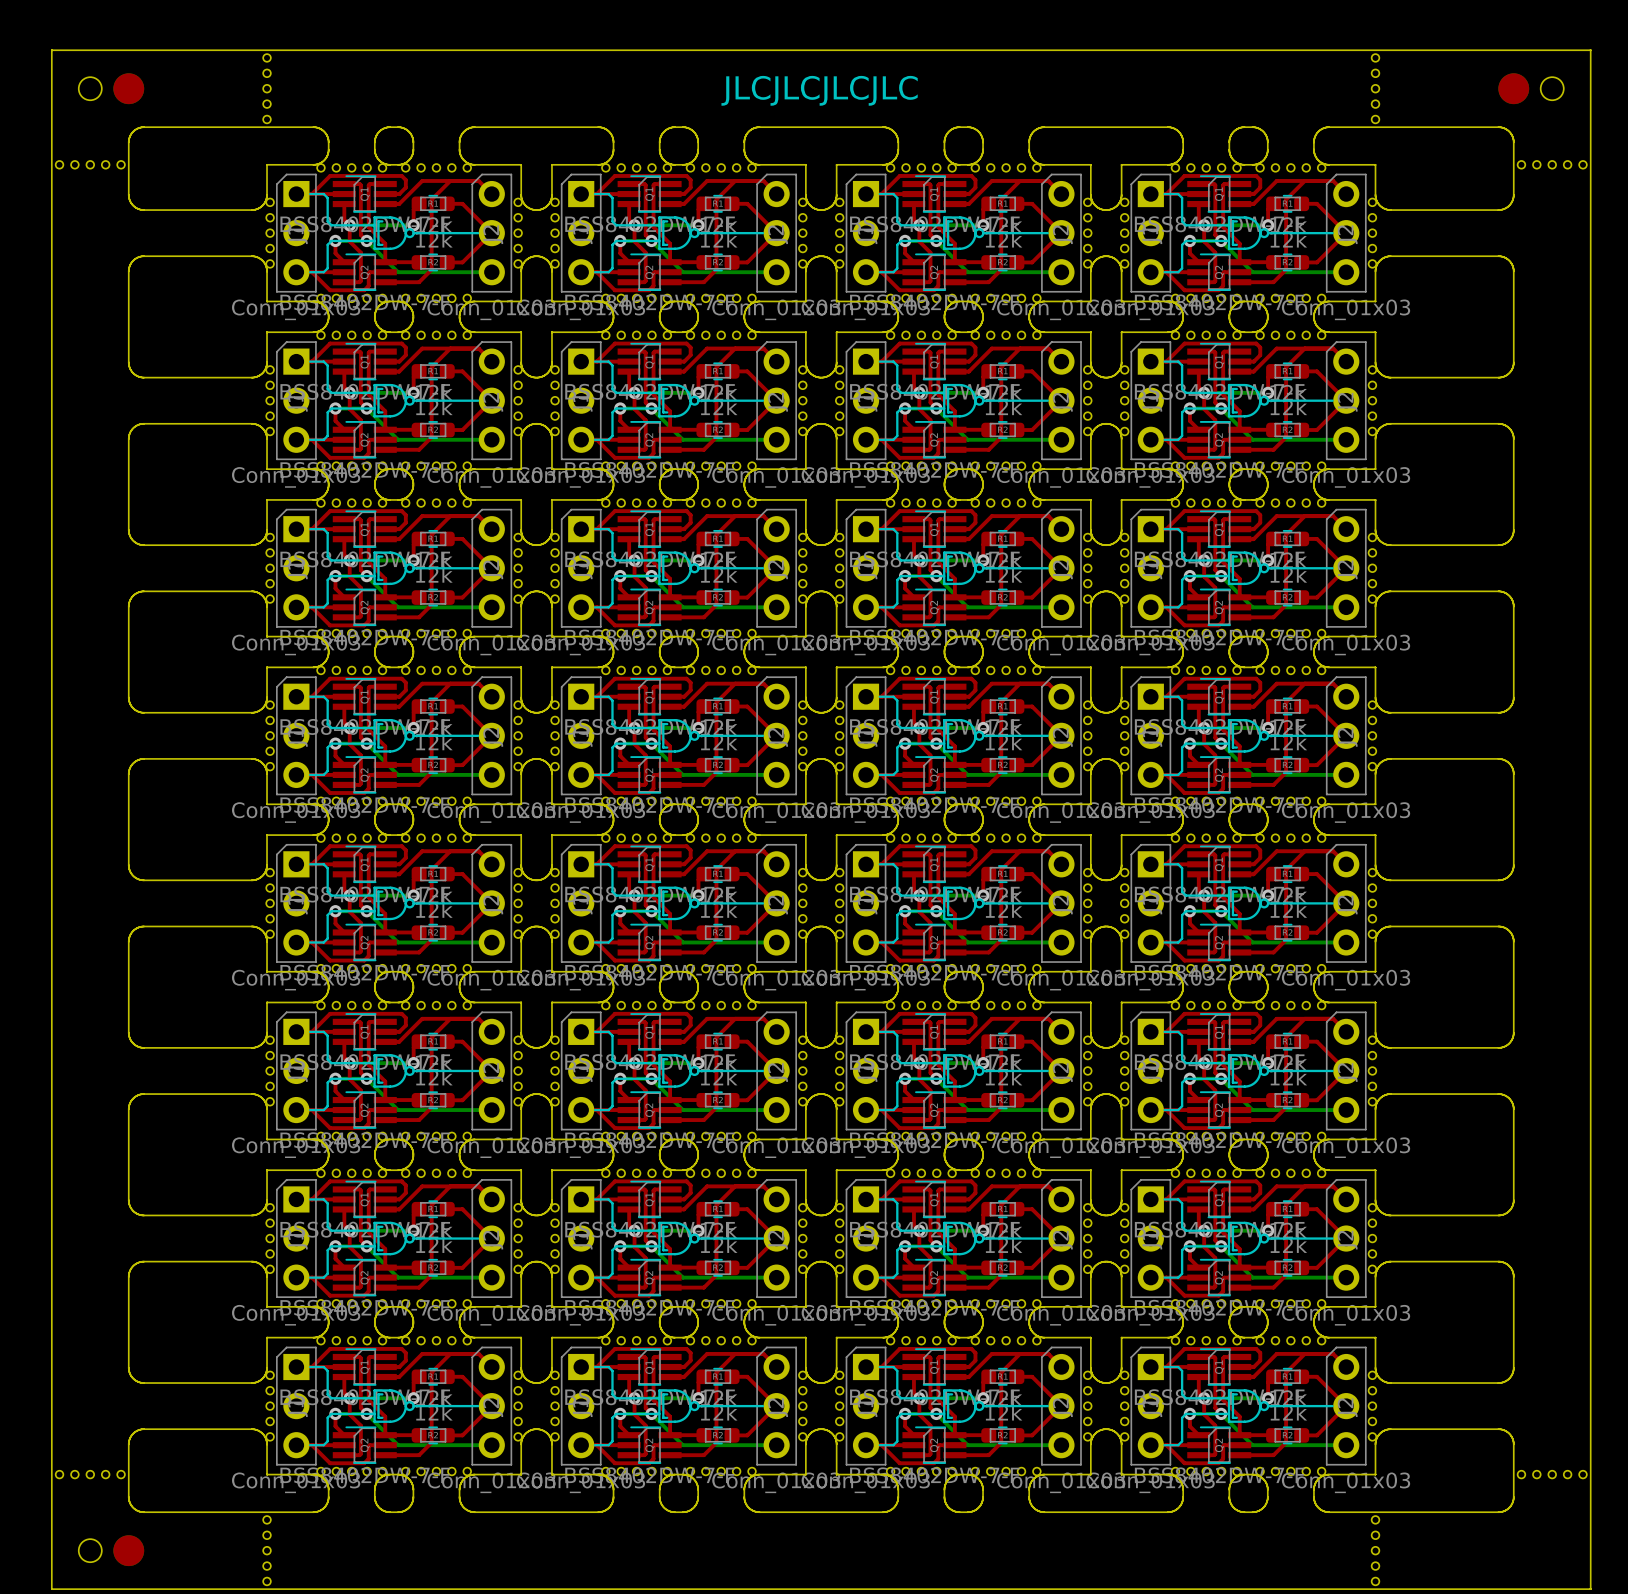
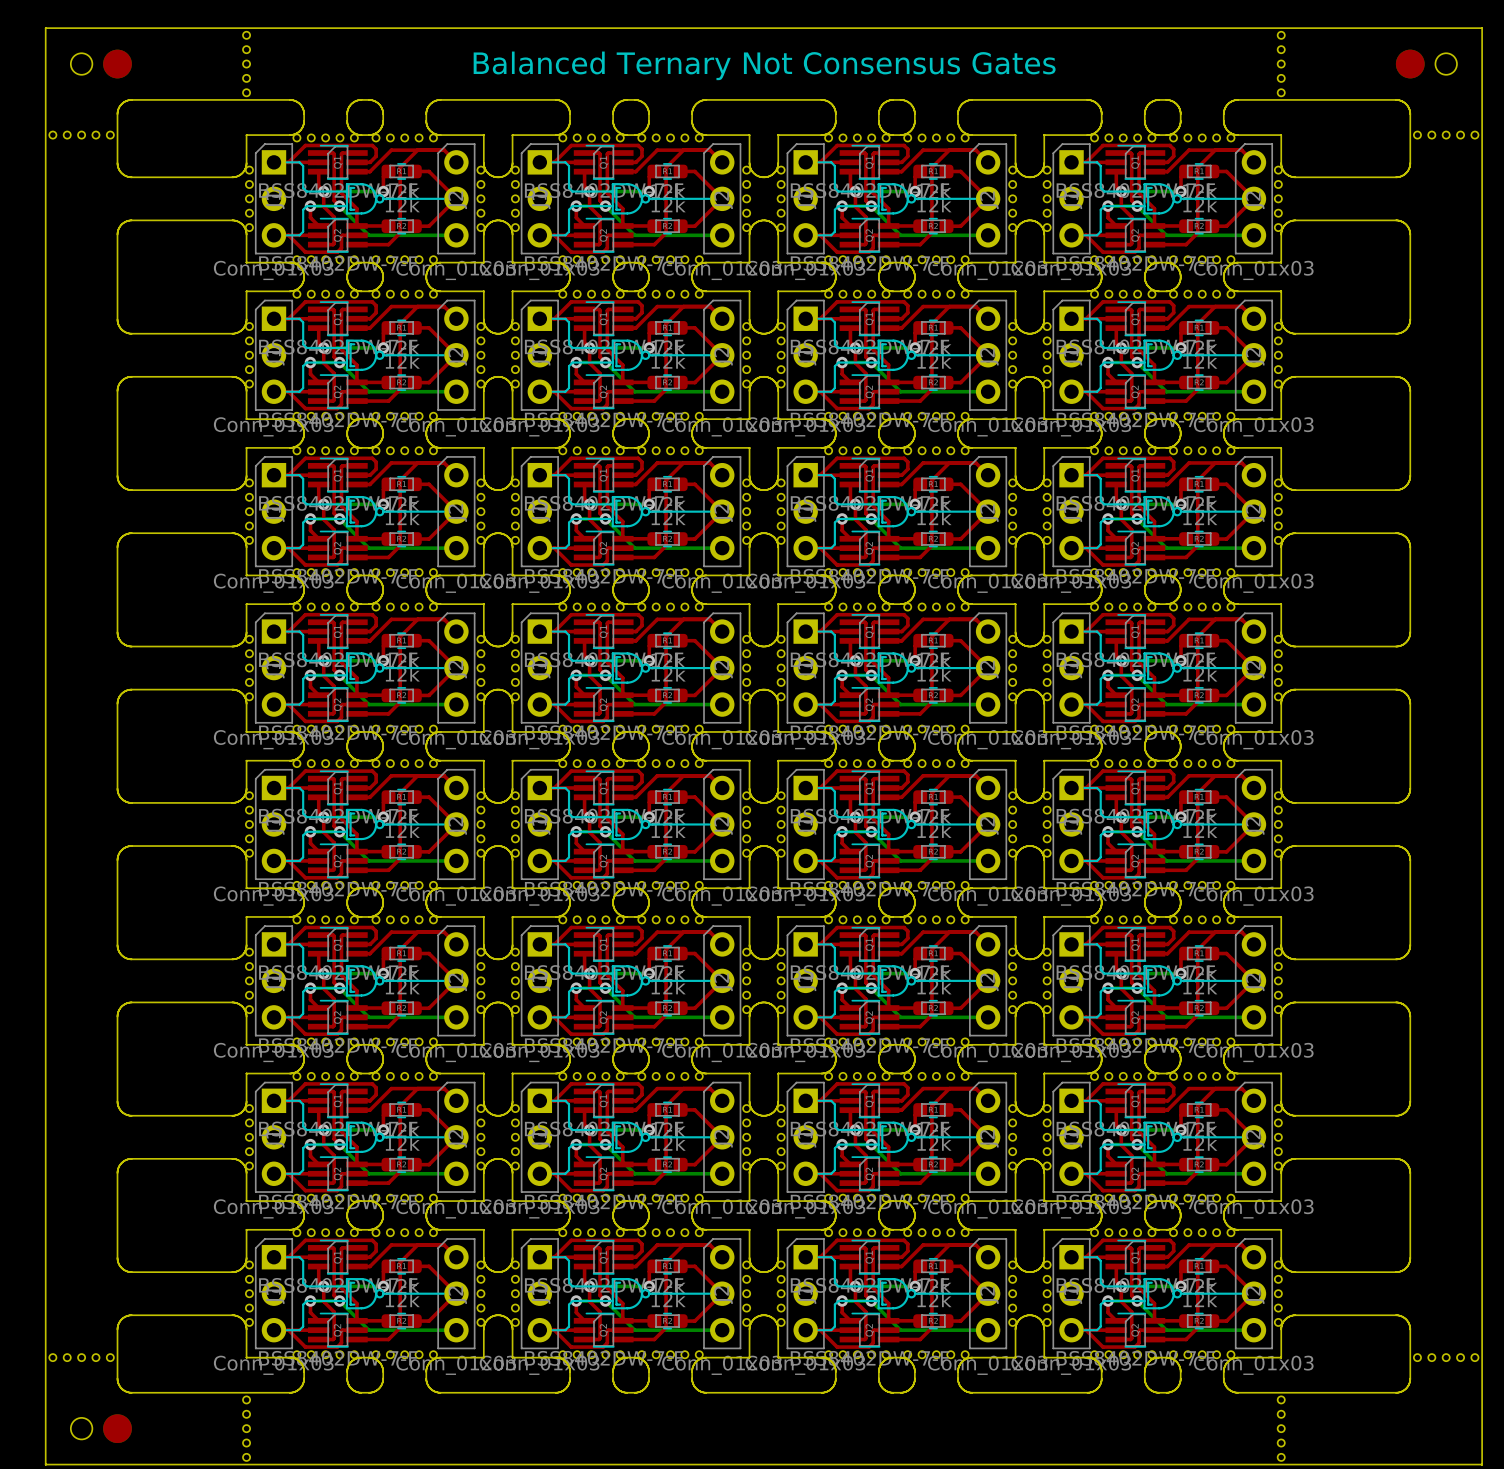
text: JLCJLCJLCJLC (819, 90) -> Balanced Ternary Not Consensus Gates (764, 65)

